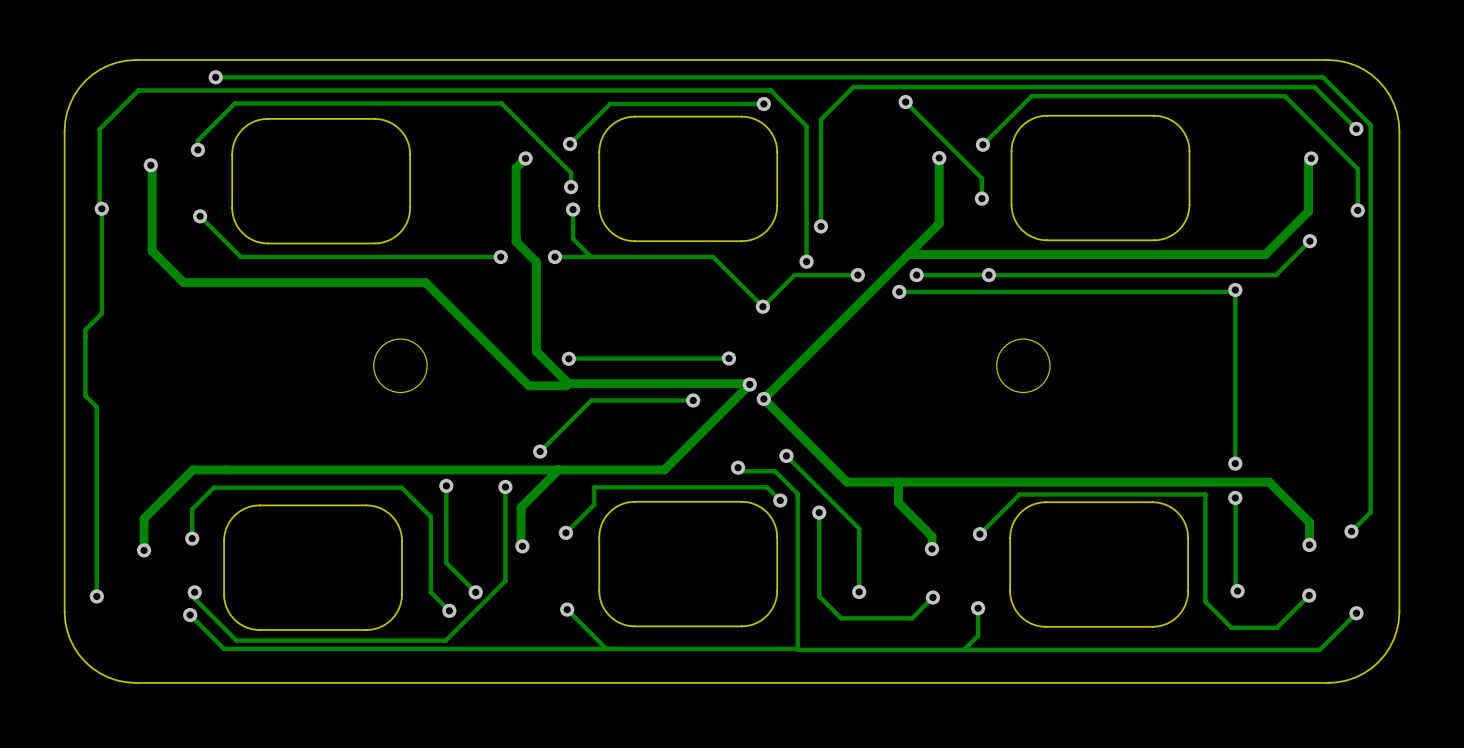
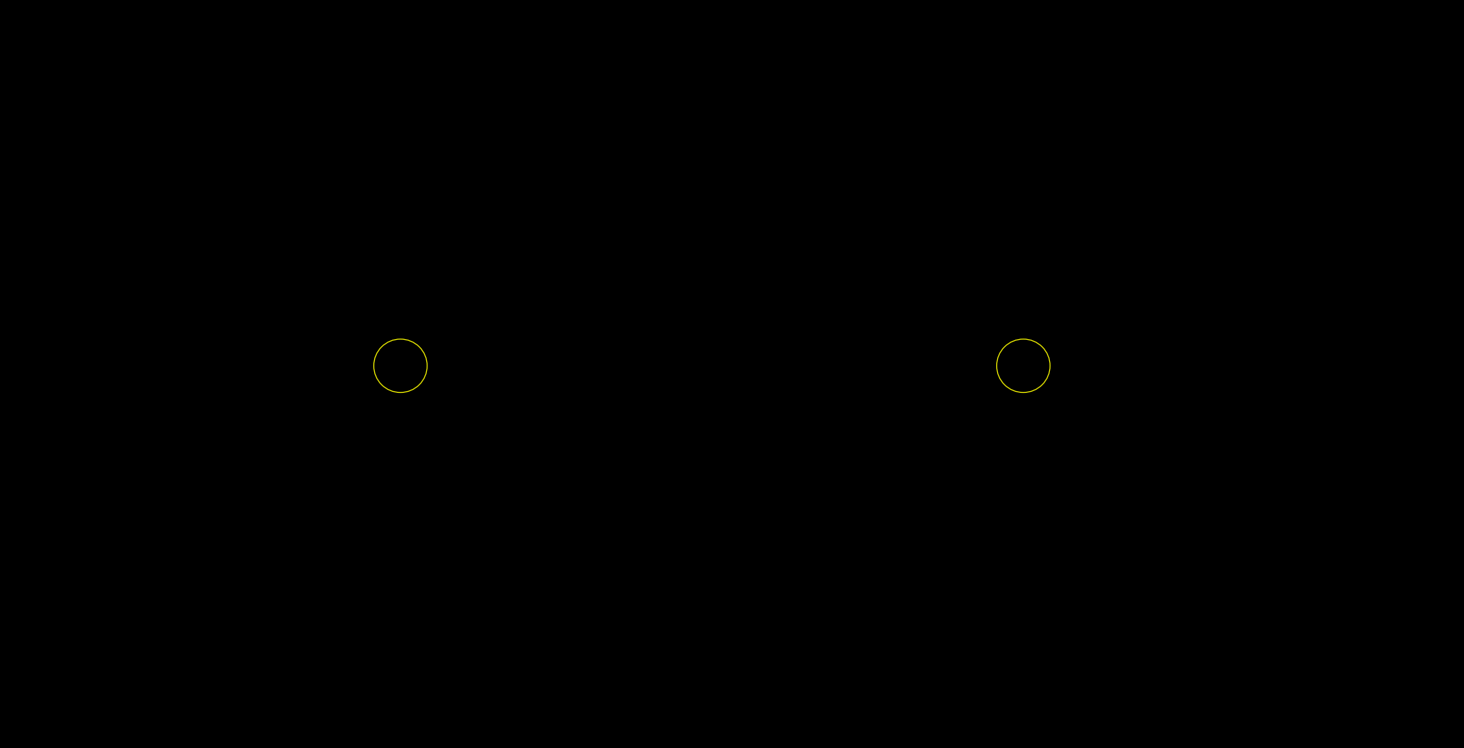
board edge: (1328, 60) (135, 60) (108, 65) (92, 74) (79, 87) (70, 103) (65, 121) (64, 611) (70, 638) (79, 655) (92, 668) (108, 677) (135, 682) (1328, 682) (1355, 677) (1371, 668) (1384, 655) (1393, 638) (1398, 621) (1399, 131) (1393, 103) (1378, 80) (1355, 65) (1328, 60) -> none
track: (215, 77) (1322, 77) (1370, 124) (1370, 512) (1351, 531) -> none
via: (215, 77) -> none
track: (905, 102) (981, 178) (981, 198) -> none
via: (905, 102) -> none
track: (763, 103) (610, 103) (570, 144) -> none
via: (763, 103) -> none
board edge: (1153, 115) (1043, 115) (1024, 123) (1015, 135) (1011, 151) (1011, 208) (1019, 226) (1031, 236) (1047, 240) (1157, 240) (1176, 232) (1184, 223) (1189, 208) (1188, 143) (1184, 132) (1176, 123) (1165, 117) (1153, 115) -> none
board edge: (741, 116) (630, 116) (612, 124) (602, 136) (599, 152) (599, 209) (607, 227) (619, 237) (634, 241) (745, 240) (763, 233) (773, 221) (777, 209) (776, 144) (771, 133) (763, 124) (753, 118) (741, 116) -> none
board edge: (374, 118) (263, 119) (245, 126) (235, 139) (232, 154) (232, 211) (239, 230) (252, 239) (267, 243) (378, 243) (396, 235) (406, 223) (409, 211) (409, 146) (404, 135) (396, 126) (386, 120) (374, 118) -> none
track: (1356, 128) (1314, 87) (853, 87) (820, 119) (820, 226) -> none
via: (1356, 128) -> none
via: (570, 144) -> none
track: (982, 144) (1031, 96) (1284, 96) (1357, 168) (1357, 210) -> none
via: (982, 144) -> none
track: (197, 149) (197, 140) (234, 103) (501, 103) (571, 172) (571, 187) -> none
via: (197, 149) -> none
track: (525, 158) (516, 167) (516, 241) (536, 261) (536, 351) (568, 383) -> none
via: (525, 158) -> none
track: (939, 158) (939, 223) (763, 398) (847, 482) (1269, 482) (1309, 522) (1309, 544) -> none
via: (939, 158) -> none
track: (1311, 158) (1308, 161) (1308, 211) (1265, 254) (908, 254) -> none
via: (1311, 158) -> none
track: (150, 165) (152, 251) (183, 282) (425, 282) (528, 385) (566, 385) (568, 383) -> none
via: (150, 165) -> none
via: (571, 187) -> none
via: (981, 198) -> none
via: (101, 208) -> none
track: (573, 209) (573, 238) (591, 257) -> none
via: (573, 209) -> none
via: (1357, 210) -> none
track: (200, 216) (240, 257) (500, 257) -> none
via: (200, 216) -> none
via: (820, 226) -> none
track: (1309, 241) (1276, 275) (916, 275) -> none
via: (1309, 241) -> none
via: (500, 257) -> none
track: (554, 257) (713, 257) (762, 306) (794, 275) (857, 275) -> none
via: (554, 257) -> none
track: (806, 261) (806, 126) (770, 90) (138, 90) (99, 129) (101, 313) (85, 330) (85, 395) (96, 407) (96, 596) -> none
via: (806, 261) -> none
via: (857, 275) -> none
via: (916, 275) -> none
via: (988, 275) -> none
via: (1235, 290) -> none
track: (899, 291) (1233, 291) (1235, 290) (1235, 463) -> none
via: (899, 291) -> none
via: (762, 306) -> none
via: (568, 358) -> none
track: (728, 358) (568, 358) -> none
via: (728, 358) -> none
track: (568, 383) (749, 384) (664, 469) (192, 469) (144, 518) (144, 550) -> none
via: (749, 384) -> none
via: (763, 398) -> none
track: (693, 400) (591, 400) (540, 451) -> none
via: (693, 400) -> none
via: (540, 451) -> none
track: (786, 455) (859, 528) (859, 591) -> none
via: (786, 455) -> none
via: (1235, 463) -> none
track: (738, 467) (741, 471) (775, 471) (797, 493) (797, 648) -> none
via: (738, 467) -> none
track: (558, 469) (521, 507) (522, 546) -> none
track: (898, 482) (898, 502) (931, 536) (931, 549) -> none
track: (446, 485) (446, 562) (475, 592) -> none
via: (446, 485) -> none
track: (505, 486) (505, 580) (445, 640) (236, 640) (194, 598) (194, 592) -> none
via: (505, 486) -> none
track: (1235, 497) (1235, 589) (1237, 591) -> none
via: (1235, 497) -> none
track: (780, 500) (767, 487) (594, 487) (594, 504) (565, 532) -> none
via: (780, 500) -> none
board edge: (741, 501) (630, 502) (612, 509) (602, 521) (599, 537) (599, 594) (607, 612) (619, 622) (634, 626) (745, 626) (763, 618) (773, 606) (777, 594) (776, 529) (771, 518) (763, 509) (753, 503) (741, 501) -> none
board edge: (1152, 502) (1041, 502) (1023, 510) (1013, 522) (1010, 537) (1010, 595) (1017, 613) (1030, 623) (1045, 626) (1156, 626) (1174, 619) (1182, 610) (1187, 595) (1187, 529) (1182, 518) (1174, 510) (1164, 504) (1152, 502) -> none
board edge: (366, 505) (255, 505) (237, 513) (227, 525) (224, 540) (224, 598) (231, 616) (244, 626) (259, 629) (370, 629) (388, 622) (396, 613) (401, 598) (401, 533) (396, 522) (388, 513) (378, 507) (366, 505) -> none
track: (819, 512) (819, 596) (841, 618) (912, 618) (932, 597) -> none
via: (819, 512) -> none
via: (1351, 531) -> none
via: (565, 532) -> none
track: (979, 534) (1019, 494) (1205, 494) (1205, 601) (1231, 627) (1276, 627) (1309, 595) -> none
via: (979, 534) -> none
track: (192, 538) (192, 509) (213, 487) (401, 487) (430, 516) (430, 592) (449, 610) -> none
via: (192, 538) -> none
via: (1309, 544) -> none
via: (522, 546) -> none
via: (931, 549) -> none
via: (144, 550) -> none
via: (859, 591) -> none
via: (1237, 591) -> none
via: (194, 592) -> none
via: (475, 592) -> none
via: (1309, 595) -> none
via: (96, 596) -> none
via: (932, 597) -> none
track: (978, 608) (978, 635) (964, 649) -> none
via: (978, 608) -> none
track: (567, 609) (606, 648) -> none
via: (567, 609) -> none
via: (449, 610) -> none
track: (1356, 613) (1319, 649) (797, 648) -> none
via: (1356, 613) -> none
track: (190, 615) (224, 648) (797, 648) -> none
via: (190, 615) -> none

